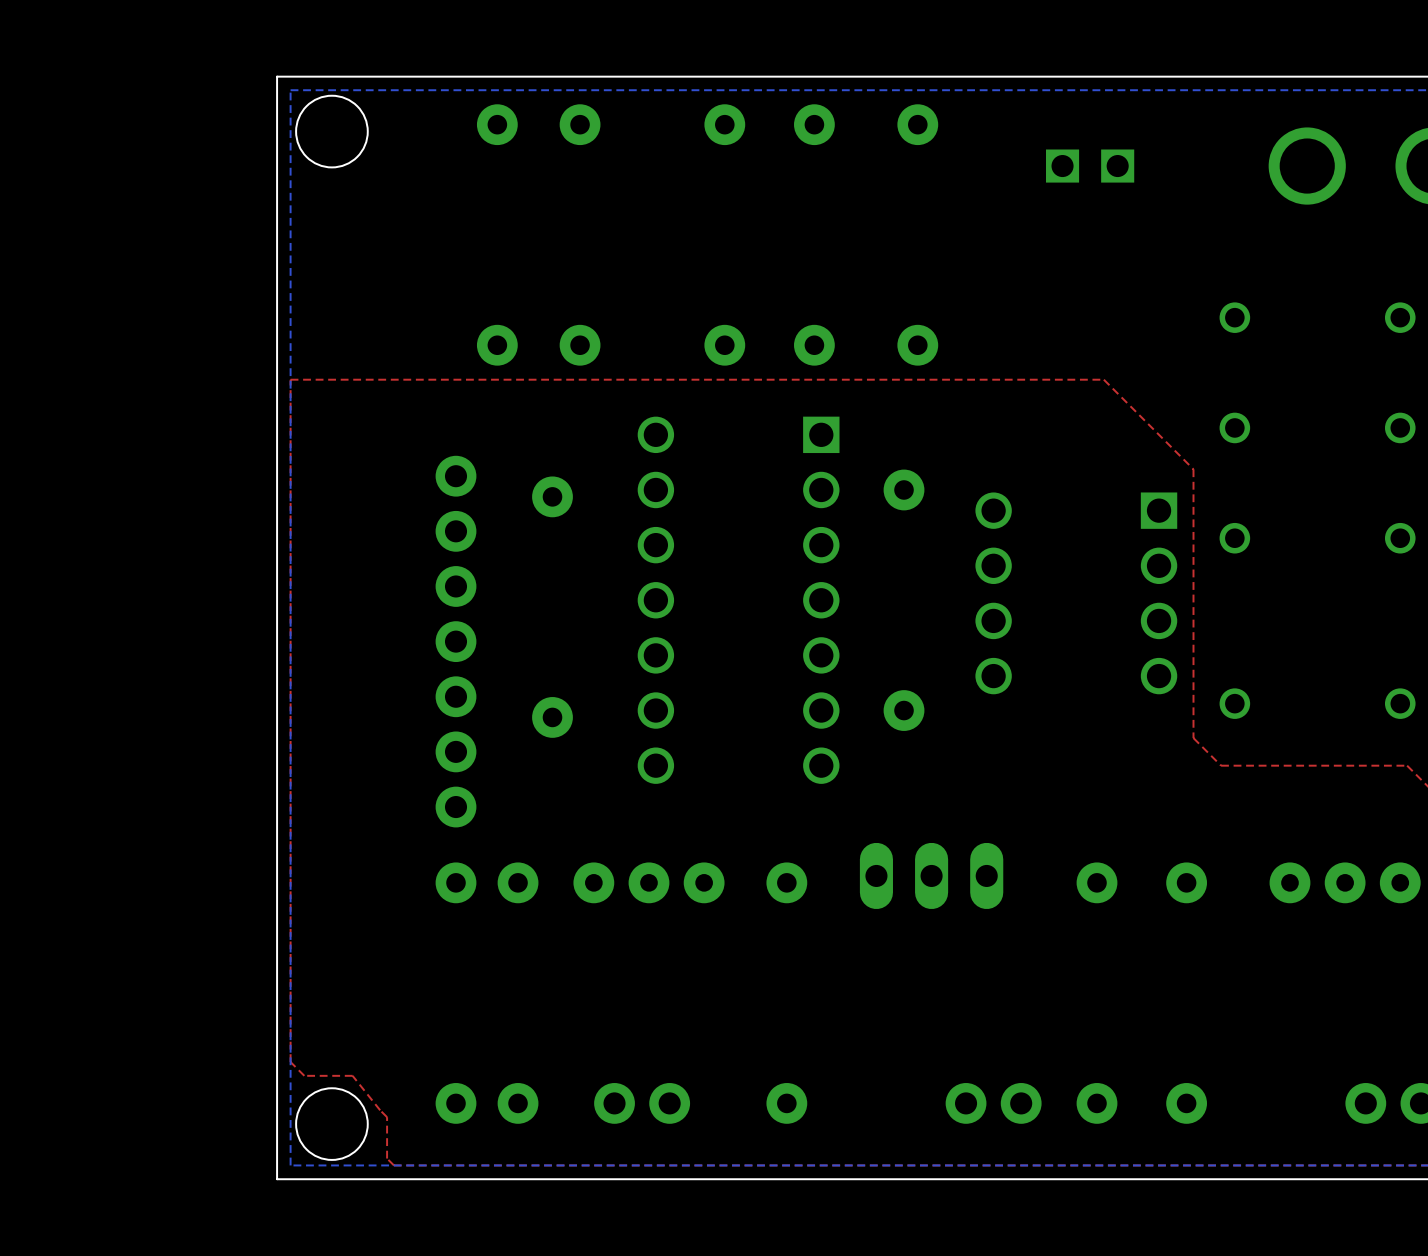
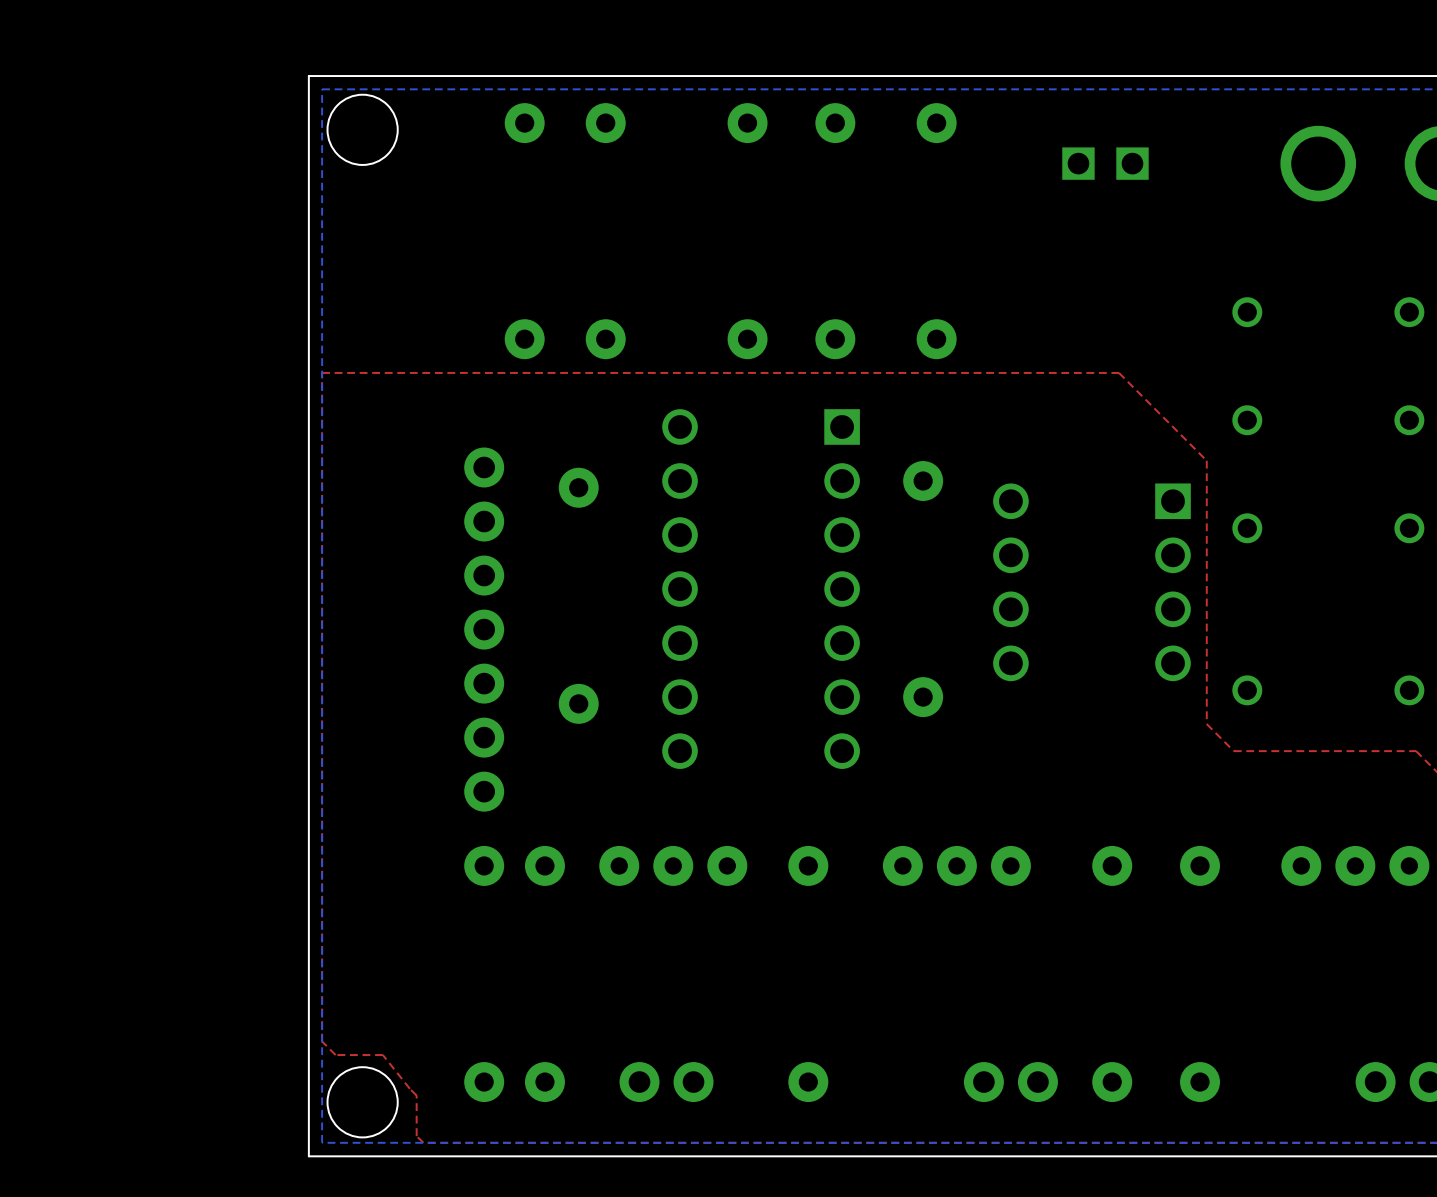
part footprint: [859, 842, 1004, 910] -> [882, 845, 1031, 886]

